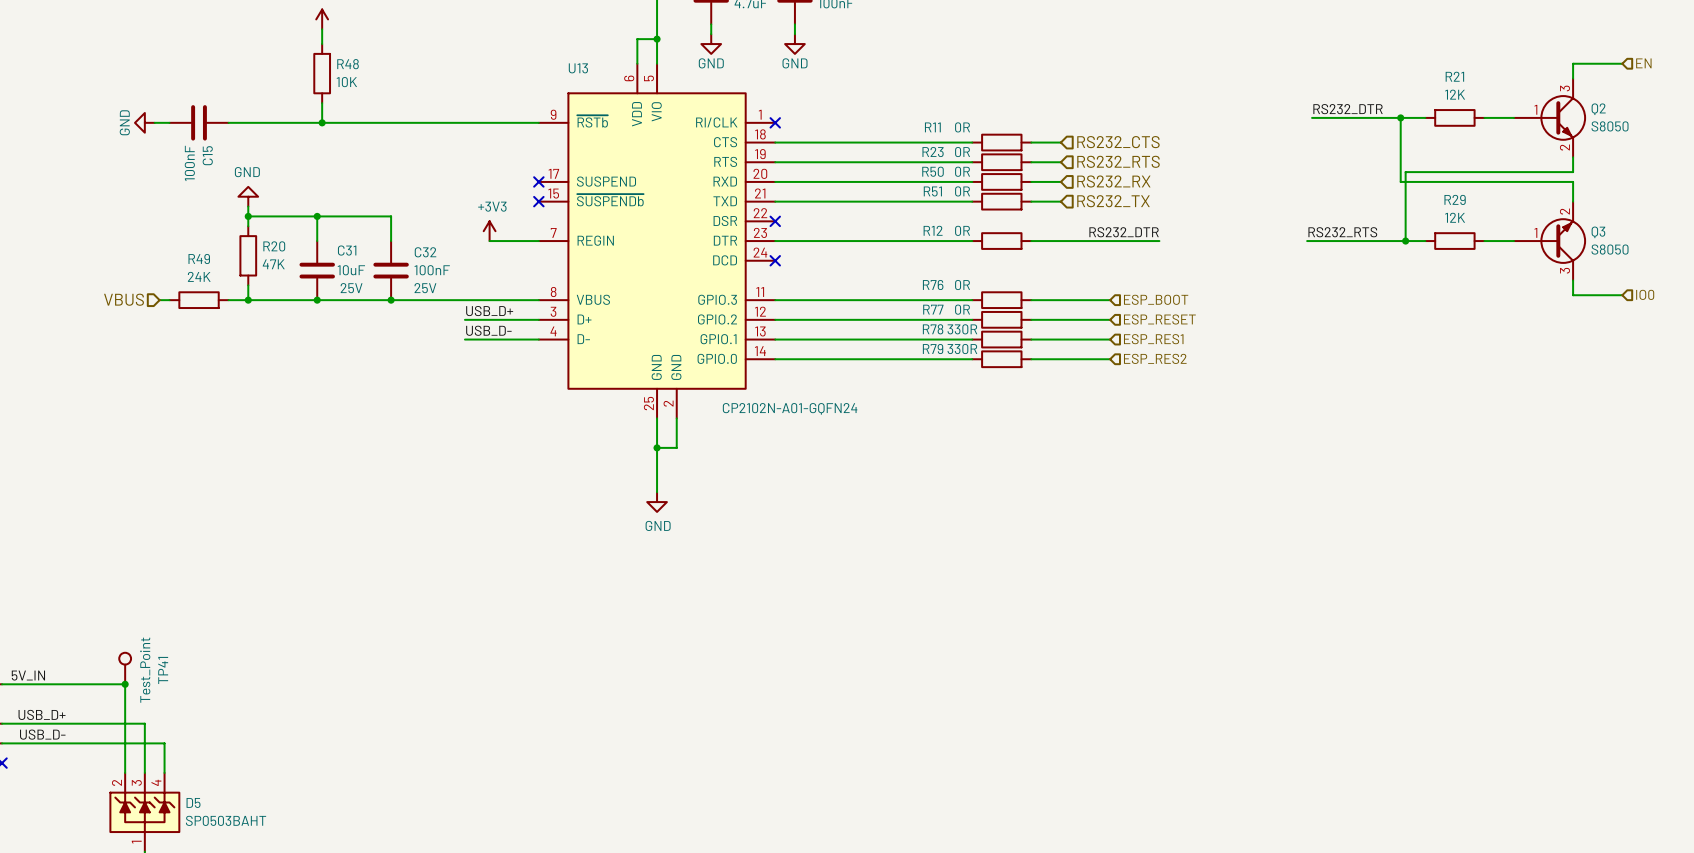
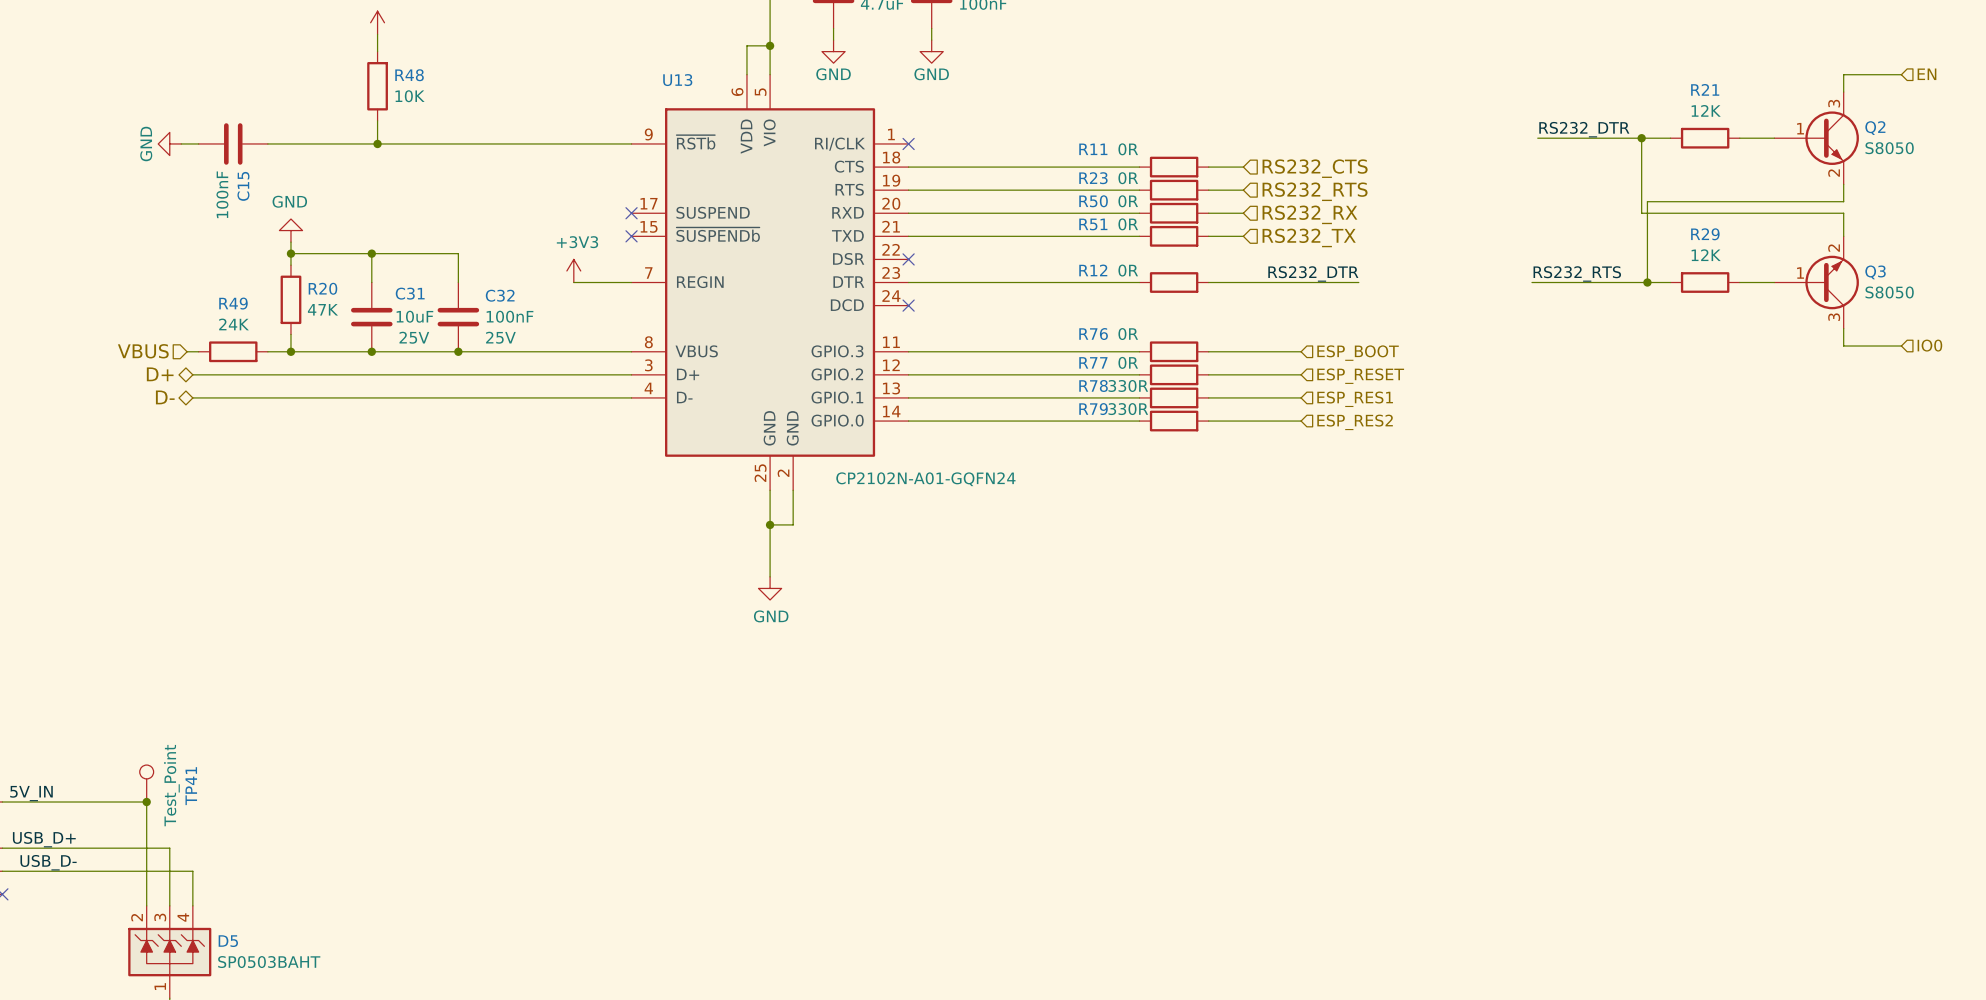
label: USB_D+ (489, 311) -> none
hierarchical label: none -> D+ (160, 374)
wire: none -> (192, 374) (544, 374)
label: USB_D- (488, 330) -> none
hierarchical label: none -> D- (165, 397)
wire: none -> (192, 397) (544, 397)

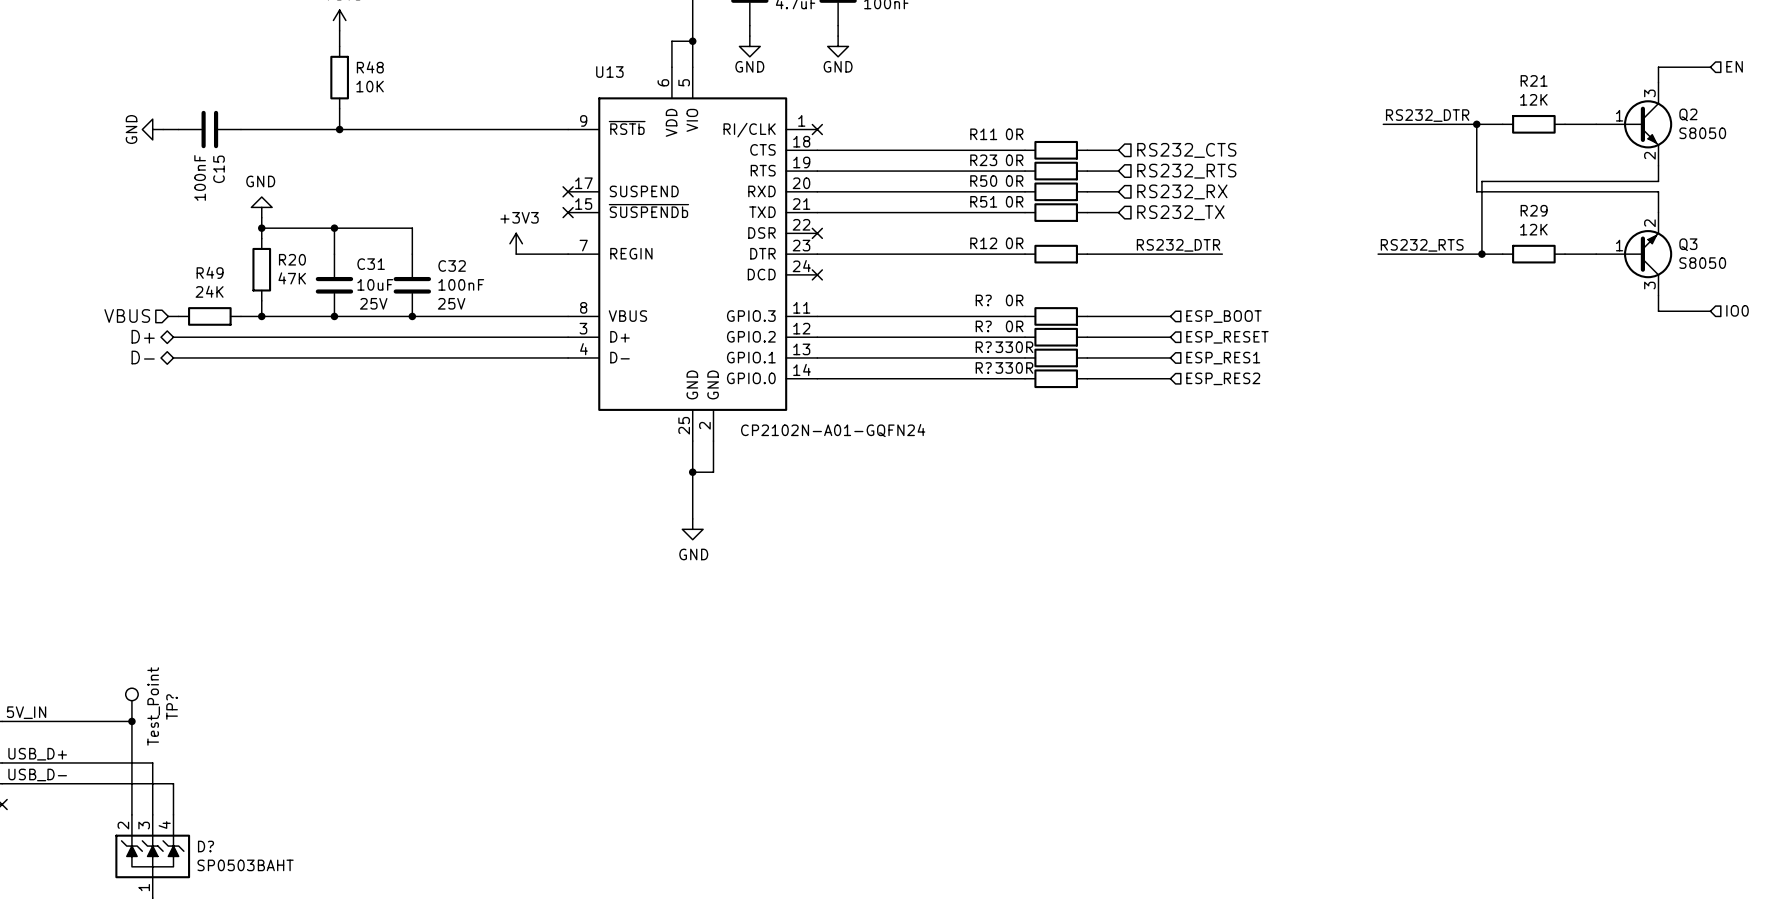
R76 name: R76 (1093, 334) -> R? (983, 300)
R77 name: R77 (1093, 362) -> R? (983, 326)
R78 name: R78 (1093, 385) -> R? (983, 347)
R79 name: R79 (1093, 409) -> R? (983, 367)
TP41 name: TP41 (191, 786) -> TP? (172, 706)
D5 name: D5 (228, 941) -> D? (206, 846)

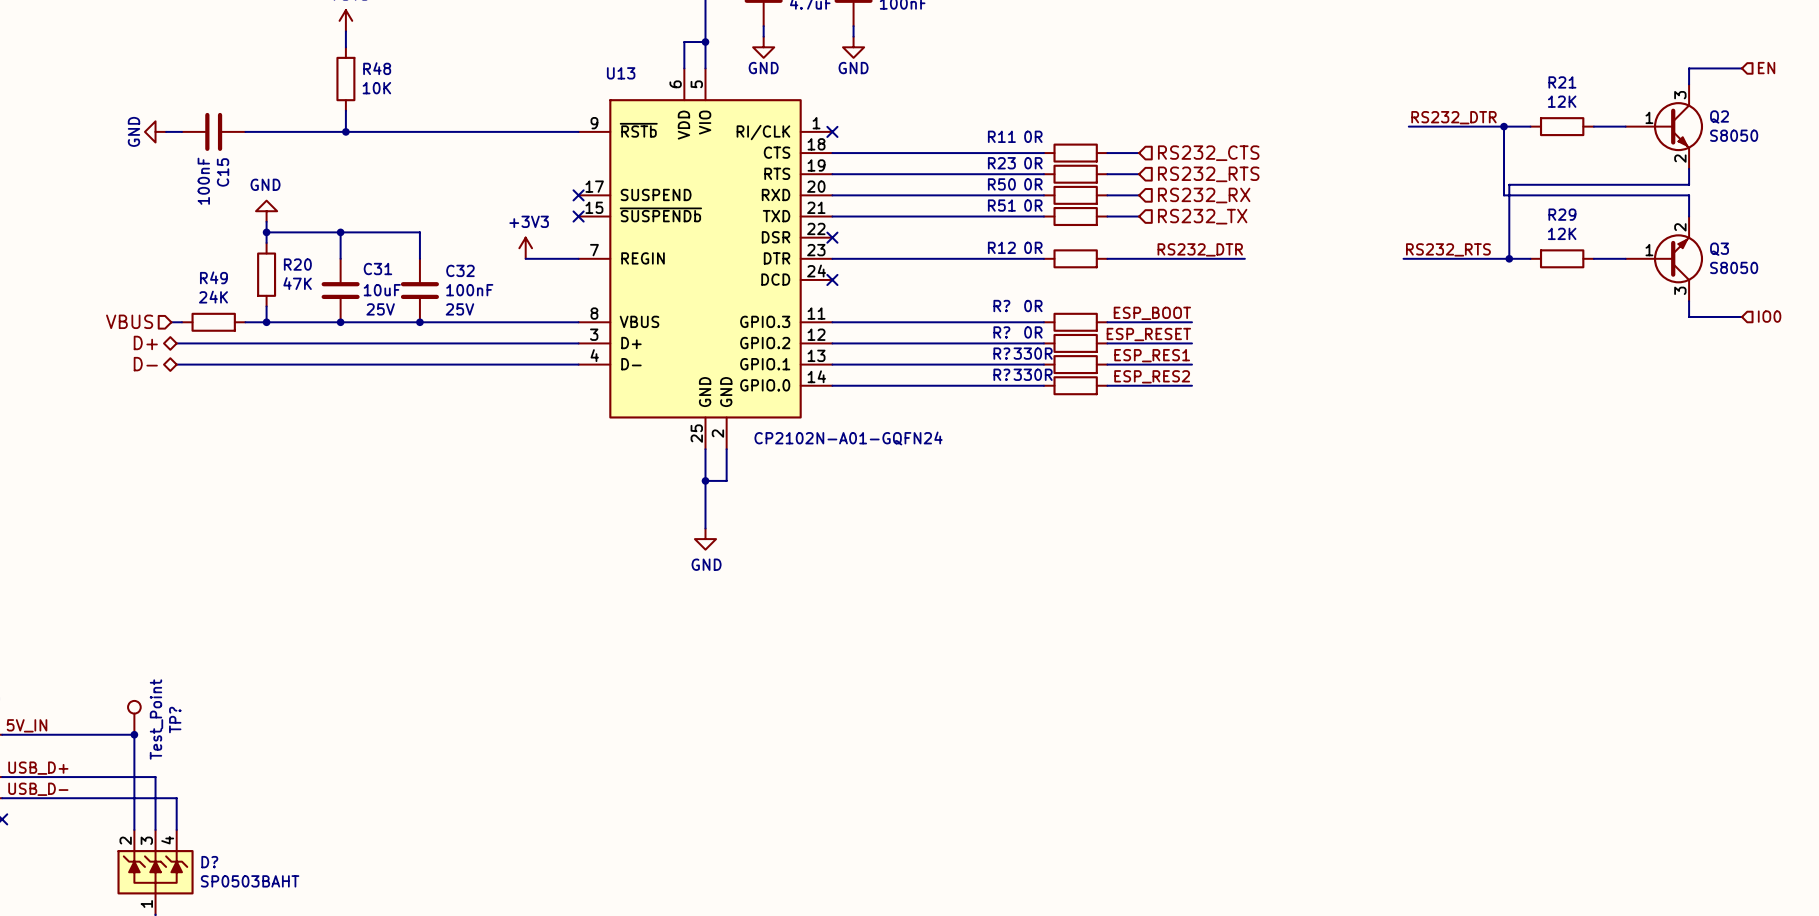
label: none -> ESP_BOOT (1152, 313)
hierarchical label: ESP_BOOT (1223, 316) -> none
label: none -> ESP_RESET (1148, 334)
hierarchical label: ESP_RESET (1227, 337) -> none
label: none -> ESP_RES1 (1152, 355)
hierarchical label: ESP_RES1 (1223, 358) -> none
label: none -> ESP_RES2 (1152, 376)
hierarchical label: ESP_RES2 (1223, 378) -> none

